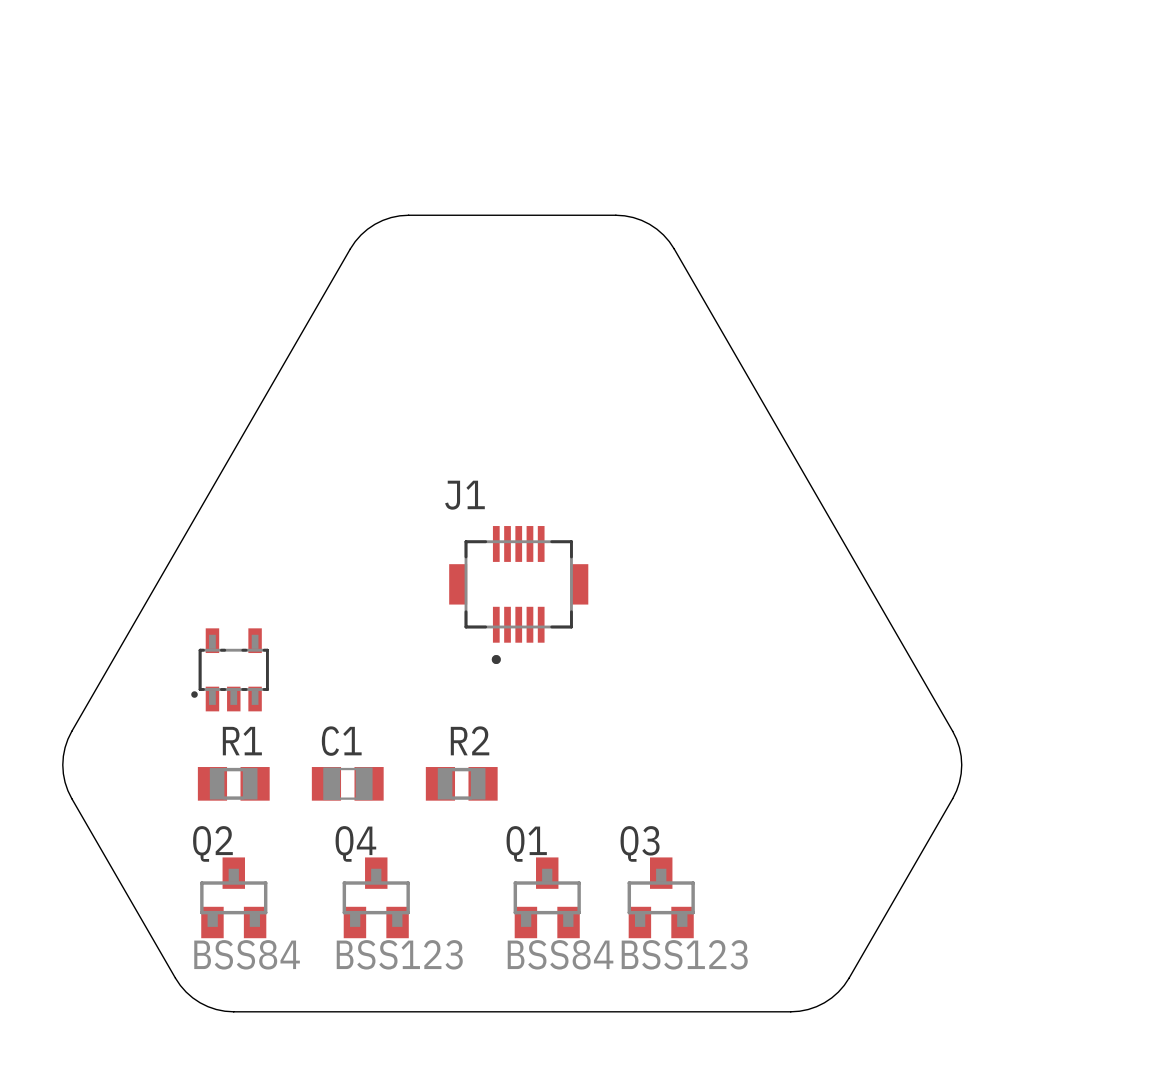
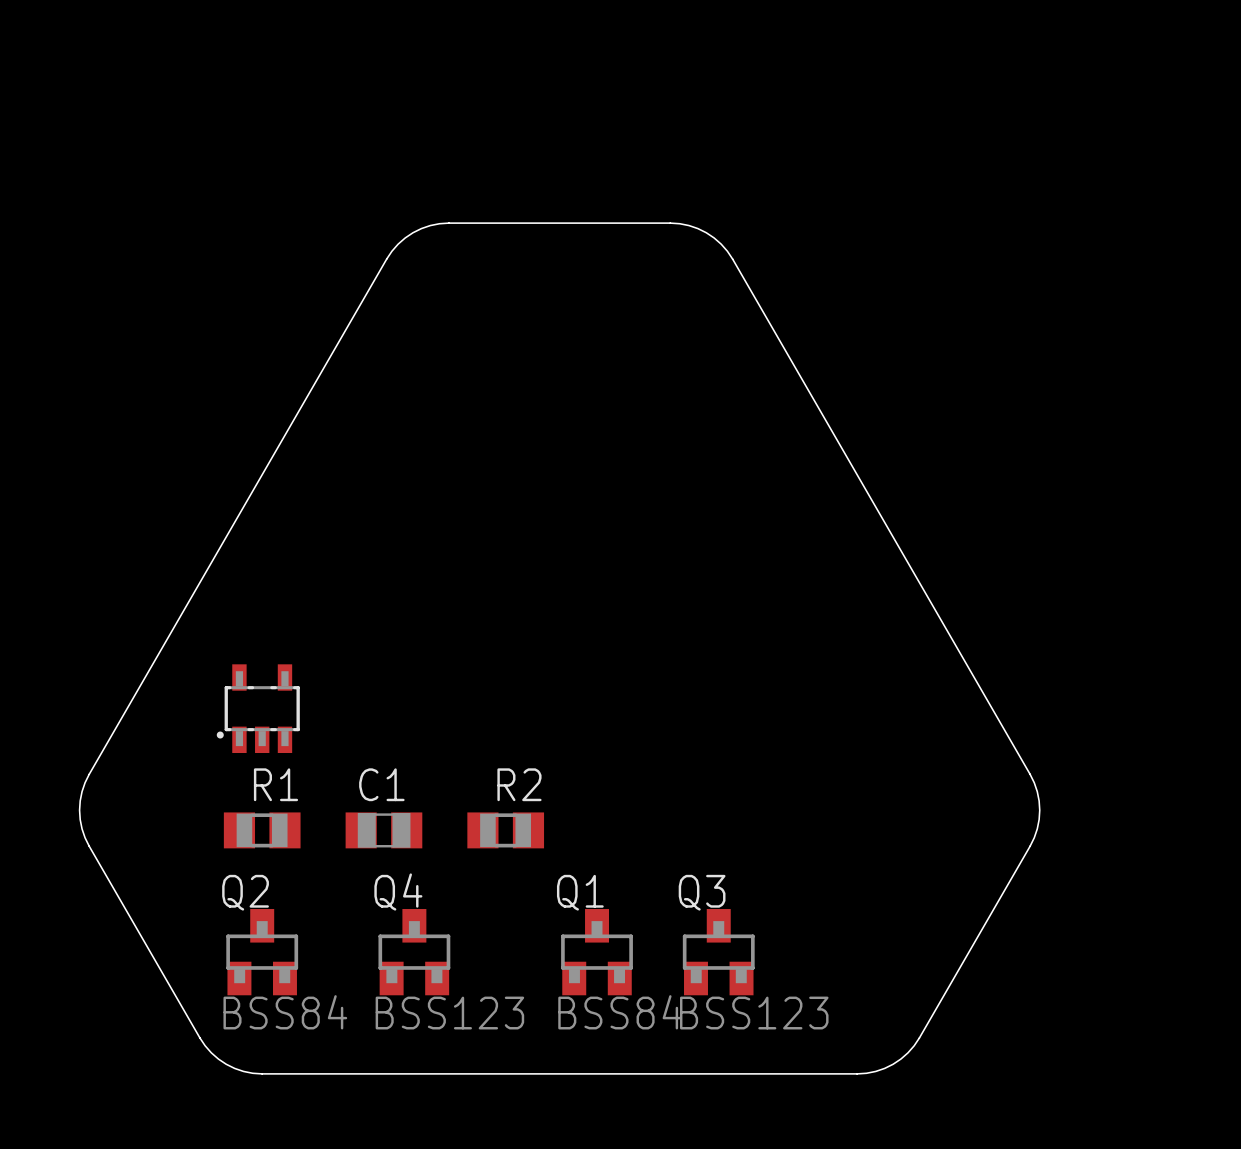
J1: (518, 595) -> none

